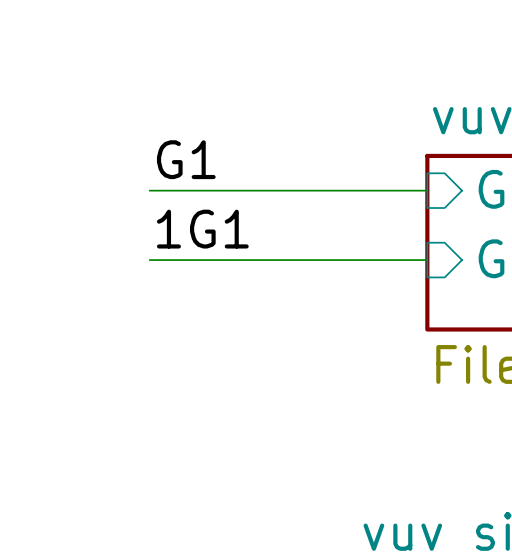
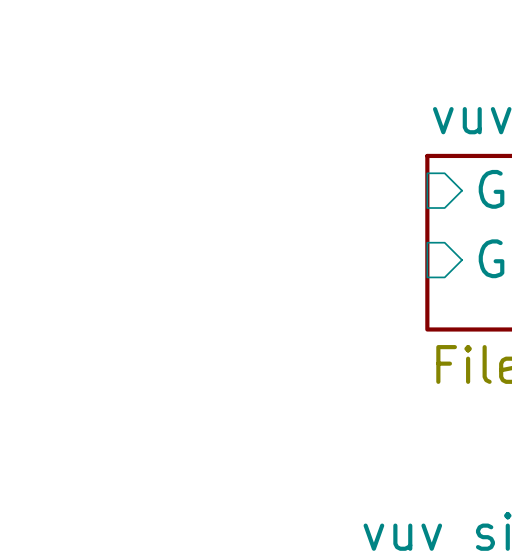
label: G1 (186, 159) -> none
wire: (149, 190) (427, 190) -> none
label: 1G1 (202, 229) -> none
wire: (149, 260) (427, 260) -> none

